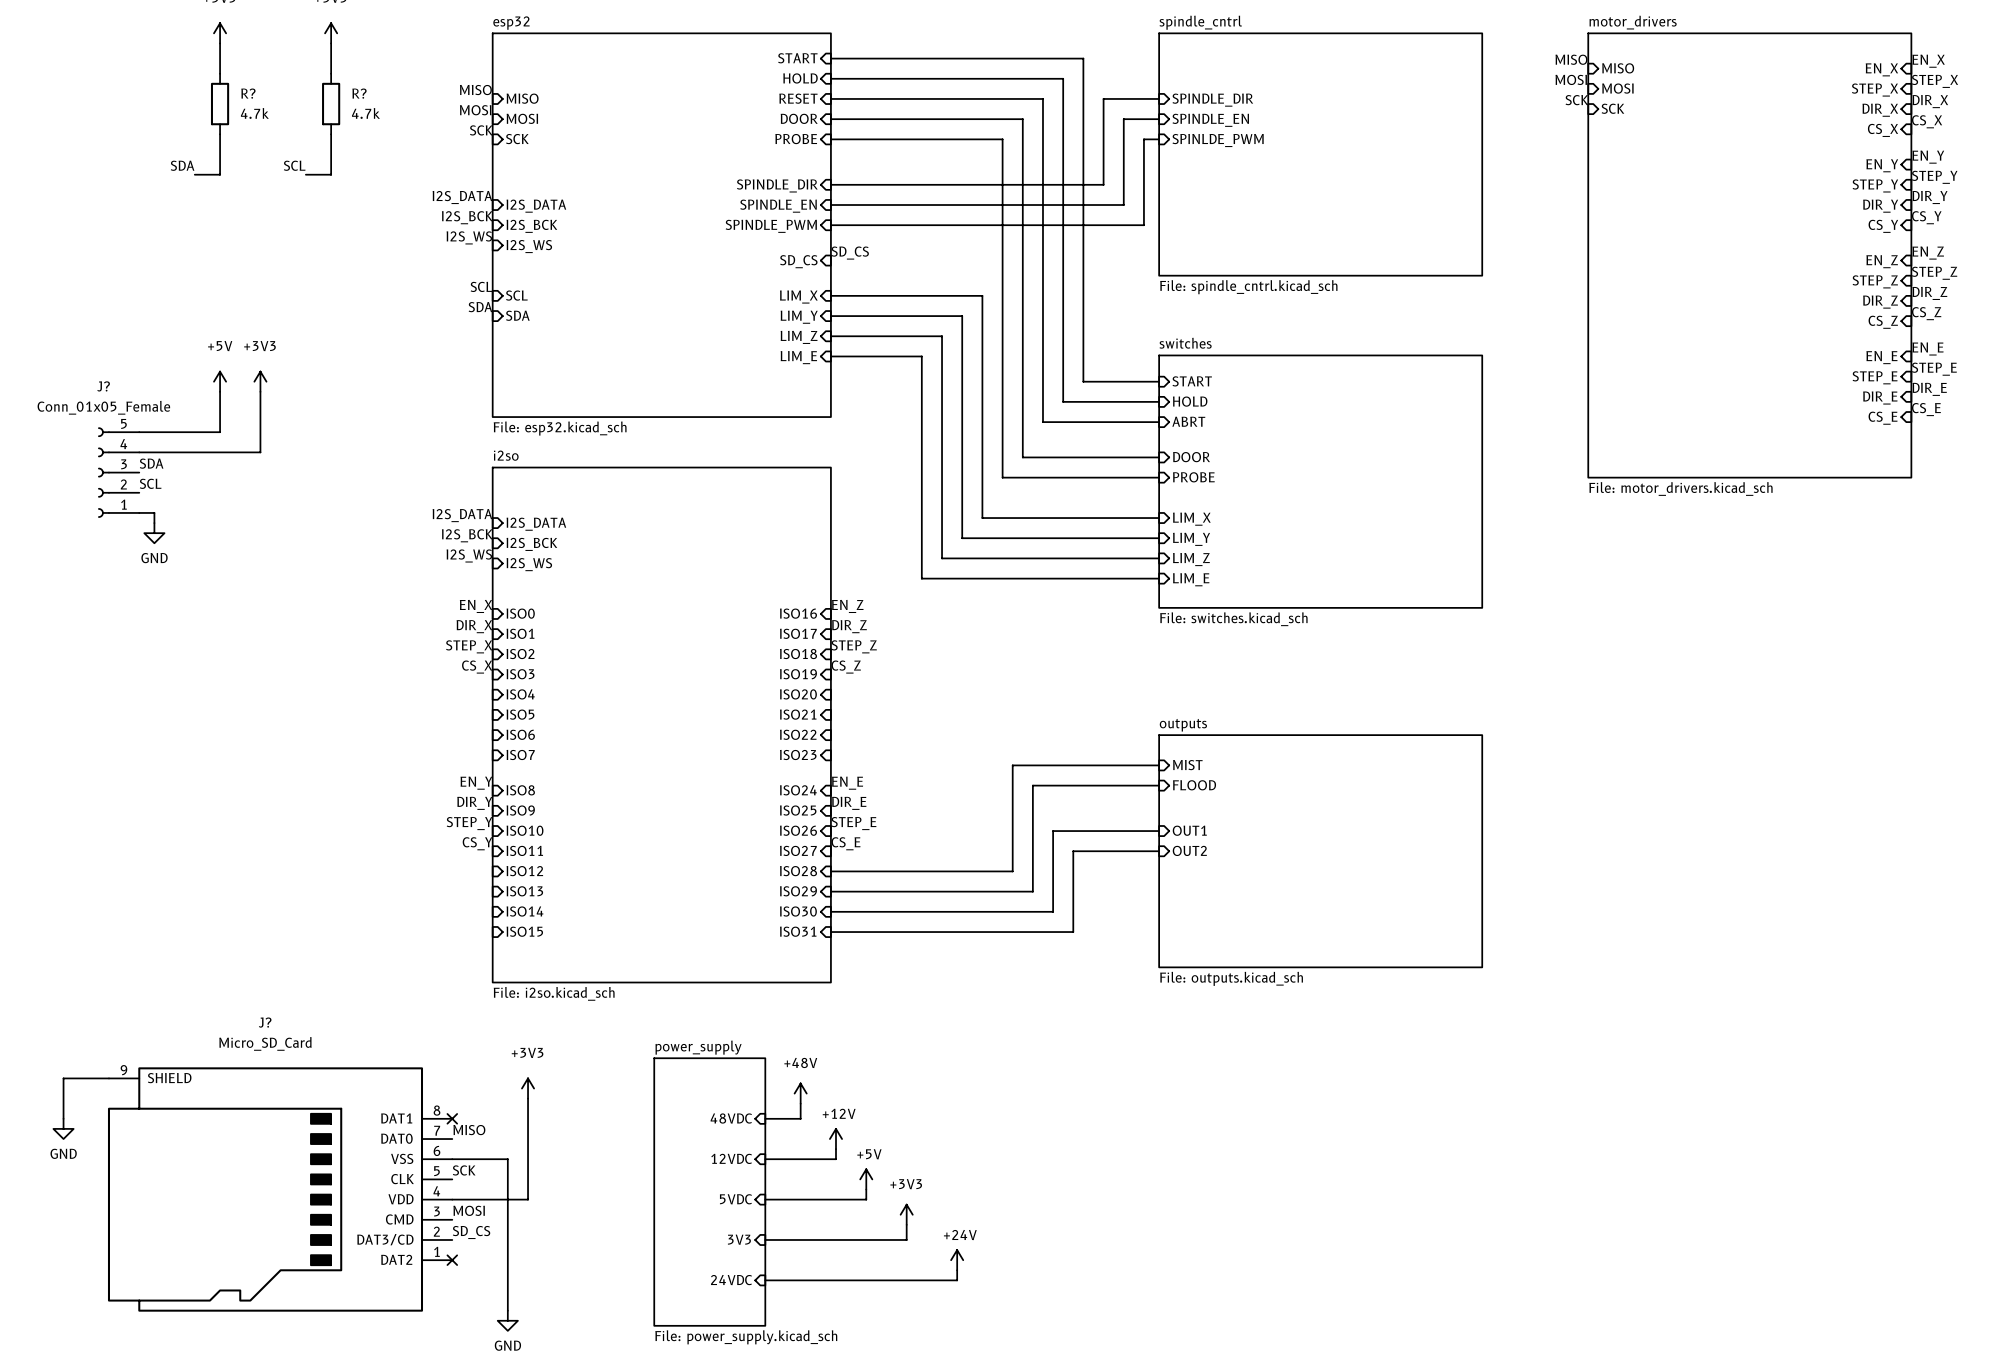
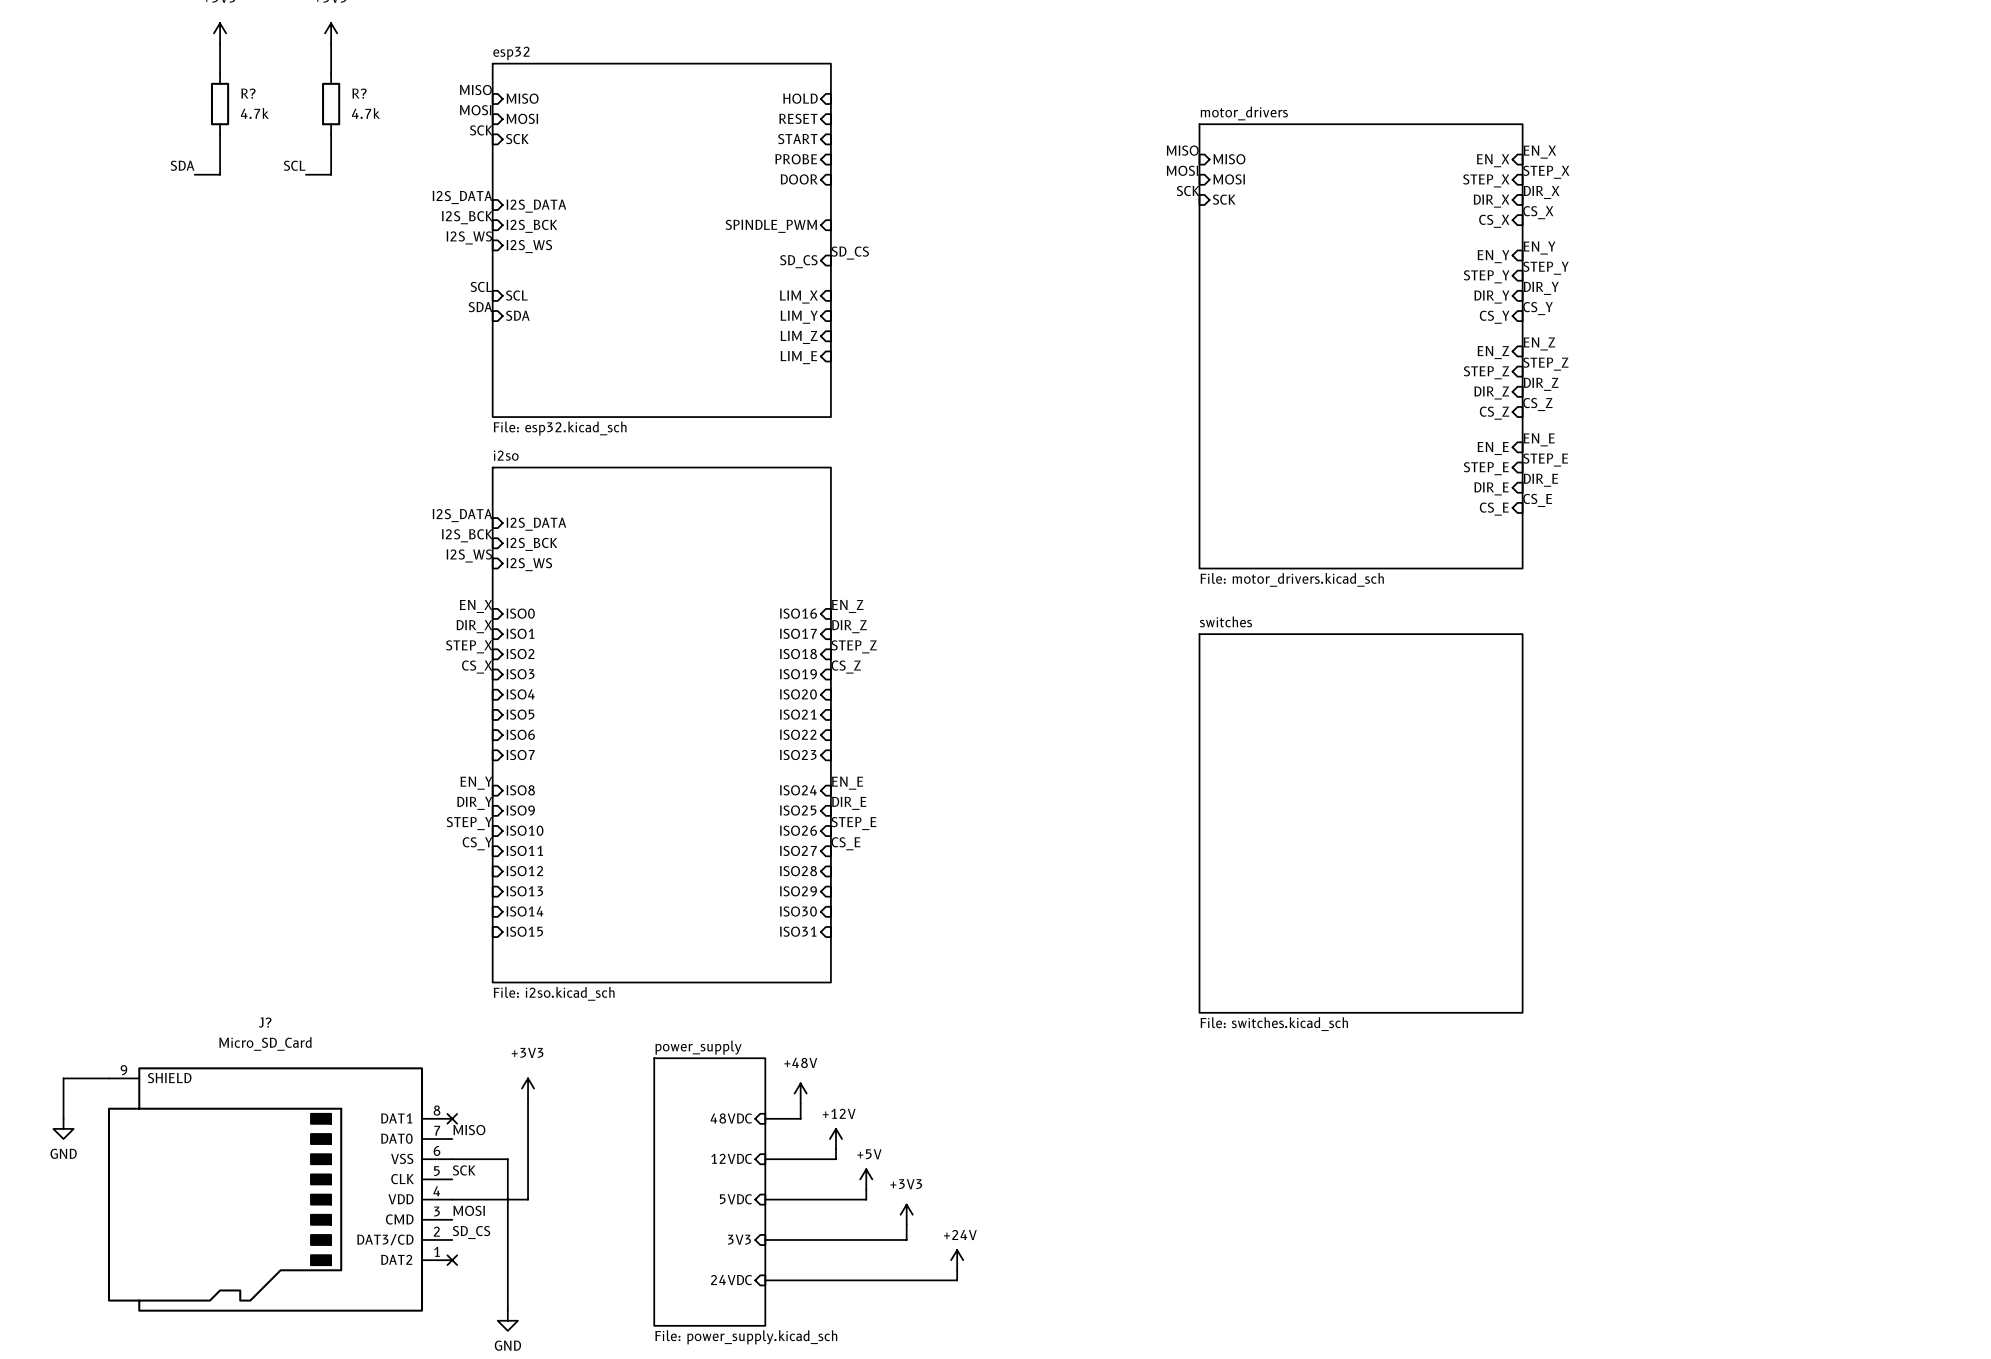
sheet esp32 shape: [492, 32, 832, 418] -> [492, 63, 832, 418]
sheet pin: START (797, 58) -> none
wire: (830, 58) (1083, 58) (1083, 381) (1159, 381) -> none
label: MISO (1571, 59) -> none
label: EN_X (1928, 61) -> none
sheet pin: MISO (1618, 68) -> none
sheet pin: EN_X (1881, 69) -> none
sheet pin: HOLD (800, 78) -> none
wire: (830, 78) (1063, 78) (1063, 401) (1159, 401) -> none
label: MOSI (1571, 79) -> none
label: STEP_X (1935, 81) -> none
sheet pin: MOSI (1617, 88) -> none
sheet pin: STEP_X (1875, 90) -> none
sheet pin: RESET (798, 98) -> HOLD (800, 98)
wire: (830, 98) (1042, 98) (1042, 422) (1159, 422) -> none
wire: (1159, 98) (1103, 98) (1103, 184) (830, 184) -> none
sheet pin: SPINDLE_DIR (1212, 100) -> none
label: SCK (1576, 100) -> none
label: DIR_X (1930, 101) -> none
sheet pin: SCK (1612, 108) -> none
sheet pin: DIR_X (1880, 110) -> none
sheet pin: DOOR (799, 118) -> RESET (798, 118)
wire: (830, 119) (1022, 119) (1022, 457) (1159, 457) -> none
wire: (1159, 119) (1123, 119) (1123, 205) (830, 205) -> none
sheet pin: SPINDLE_EN (1210, 120) -> none
label: CS_X (1927, 121) -> none
sheet pin: CS_X (1883, 130) -> none
sheet pin: PROBE (796, 139) -> START (797, 139)
wire: (830, 139) (1002, 139) (1002, 477) (1159, 477) -> none
wire: (1159, 139) (1143, 139) (1143, 225) (830, 225) -> none
sheet pin: SPINLDE_PWM (1218, 140) -> none
label: none -> MISO (1182, 150)
label: none -> EN_X (1539, 152)
sheet spindle_cntrl: File: spindle_cntrl.kicad_sch (1320, 154) -> none
label: EN_Y (1928, 157) -> none
sheet pin: none -> PROBE (796, 159)
sheet pin: none -> MISO (1229, 159)
sheet pin: none -> EN_X (1493, 160)
sheet pin: EN_Y (1882, 165) -> none
label: none -> MOSI (1182, 170)
label: none -> STEP_X (1546, 172)
label: STEP_Y (1934, 177) -> none
sheet pin: none -> MOSI (1229, 179)
sheet pin: none -> STEP_X (1486, 180)
sheet pin: SPINDLE_DIR (777, 185) -> DOOR (799, 179)
sheet pin: STEP_Y (1875, 185) -> none
label: none -> SCK (1188, 191)
label: none -> DIR_X (1541, 192)
label: DIR_Y (1930, 197) -> none
sheet pin: none -> SCK (1224, 199)
sheet pin: none -> DIR_X (1491, 201)
sheet pin: SPINDLE_EN (778, 206) -> none
sheet pin: DIR_Y (1880, 206) -> none
label: none -> CS_X (1538, 212)
label: CS_Y (1926, 217) -> none
sheet pin: none -> CS_X (1494, 221)
sheet pin: CS_Y (1883, 226) -> none
label: none -> EN_Y (1539, 247)
label: EN_Z (1928, 253) -> none
sheet motor_drivers: File: motor_drivers.kicad_sch (1749, 255) -> none
sheet pin: none -> EN_Y (1493, 256)
sheet pin: EN_Z (1882, 261) -> none
label: none -> STEP_Y (1545, 268)
label: STEP_Z (1934, 273) -> none
sheet pin: none -> STEP_Y (1486, 276)
sheet pin: STEP_Z (1875, 281) -> none
label: none -> DIR_Y (1541, 288)
label: DIR_Z (1929, 293) -> none
wire: (830, 295) (982, 295) (982, 518) (1159, 518) -> none
sheet pin: none -> DIR_Y (1491, 297)
sheet pin: DIR_Z (1880, 302) -> none
label: none -> CS_Y (1538, 308)
label: CS_Z (1926, 313) -> none
wire: (830, 316) (962, 316) (962, 538) (1159, 538) -> none
sheet pin: none -> CS_Y (1494, 317)
sheet pin: CS_Z (1883, 322) -> none
wire: (830, 336) (942, 336) (942, 558) (1159, 558) -> none
label: none -> EN_Z (1539, 343)
sheet motor_drivers: none -> File: motor_drivers.kicad_sch (1361, 346)
label: EN_E (1928, 348) -> none
sheet pin: none -> EN_Z (1493, 352)
wire: (830, 356) (921, 356) (921, 578) (1159, 578) -> none
sheet pin: EN_E (1881, 357) -> none
label: none -> STEP_Z (1545, 364)
label: STEP_E (1934, 369) -> none
sheet pin: none -> STEP_Z (1486, 372)
sheet pin: STEP_E (1875, 377) -> none
power symbol: +5V (220, 381) -> none
power symbol: +3V3 (260, 381) -> none
sheet pin: START (1192, 381) -> none
label: none -> DIR_Z (1541, 384)
label: DIR_E (1929, 389) -> none
wire: (220, 391) (220, 432) (139, 432) -> none
wire: (260, 391) (260, 452) (139, 452) -> none
sheet pin: none -> DIR_Z (1491, 392)
sheet pin: DIR_E (1880, 397) -> none
sheet pin: HOLD (1190, 401) -> none
label: none -> CS_Z (1537, 404)
label: CS_E (1926, 409) -> none
sheet pin: none -> CS_Z (1494, 413)
sheet pin: CS_E (1883, 418) -> none
sheet pin: ABRT (1188, 421) -> none
label: none -> EN_E (1539, 439)
sheet pin: none -> EN_E (1493, 448)
sheet pin: DOOR (1191, 457) -> none
label: none -> STEP_E (1545, 460)
label: SDA (151, 463) -> none
sheet pin: none -> STEP_E (1486, 468)
J?: Conn_01x05_Female (118, 472) -> none
sheet pin: PROBE (1193, 477) -> none
label: none -> DIR_E (1540, 480)
sheet switches: File: switches.kicad_sch (1320, 481) -> none
label: SCL (150, 483) -> none
sheet pin: none -> DIR_E (1491, 488)
label: none -> CS_E (1537, 500)
sheet pin: none -> CS_E (1494, 509)
wire: (139, 512) (154, 512) (154, 523) -> none
sheet pin: LIM_X (1191, 519) -> none
power symbol: GND (154, 533) -> none
sheet pin: LIM_Y (1191, 539) -> none
sheet pin: LIM_Z (1191, 559) -> none
sheet pin: LIM_E (1191, 579) -> none
wire: (1159, 765) (1012, 765) (1012, 871) (830, 871) -> none
sheet pin: MIST (1187, 765) -> none
wire: (1159, 785) (1032, 785) (1032, 891) (830, 891) -> none
sheet pin: FLOOD (1194, 785) -> none
sheet switches: none -> File: switches.kicad_sch (1361, 823)
sheet pin: OUT1 (1189, 830) -> none
wire: (1159, 831) (1053, 831) (1053, 911) (830, 911) -> none
sheet pin: OUT2 (1189, 850) -> none
wire: (1159, 851) (1073, 851) (1073, 932) (830, 932) -> none
sheet outputs: File: outputs.kicad_sch (1320, 851) -> none

